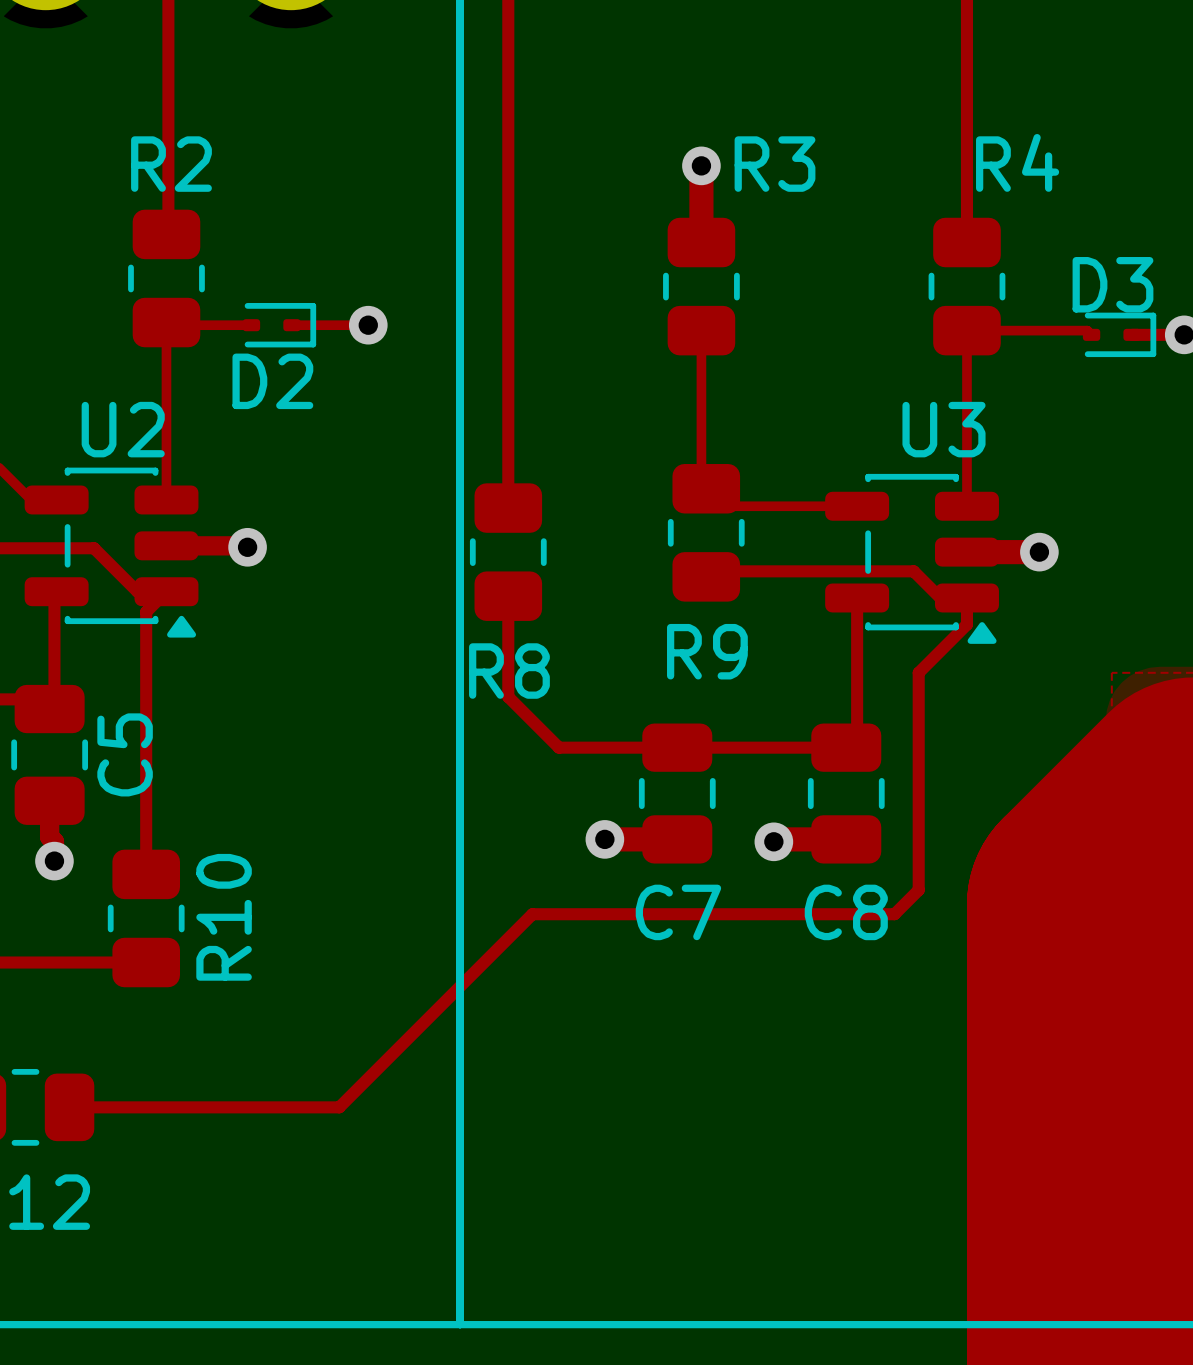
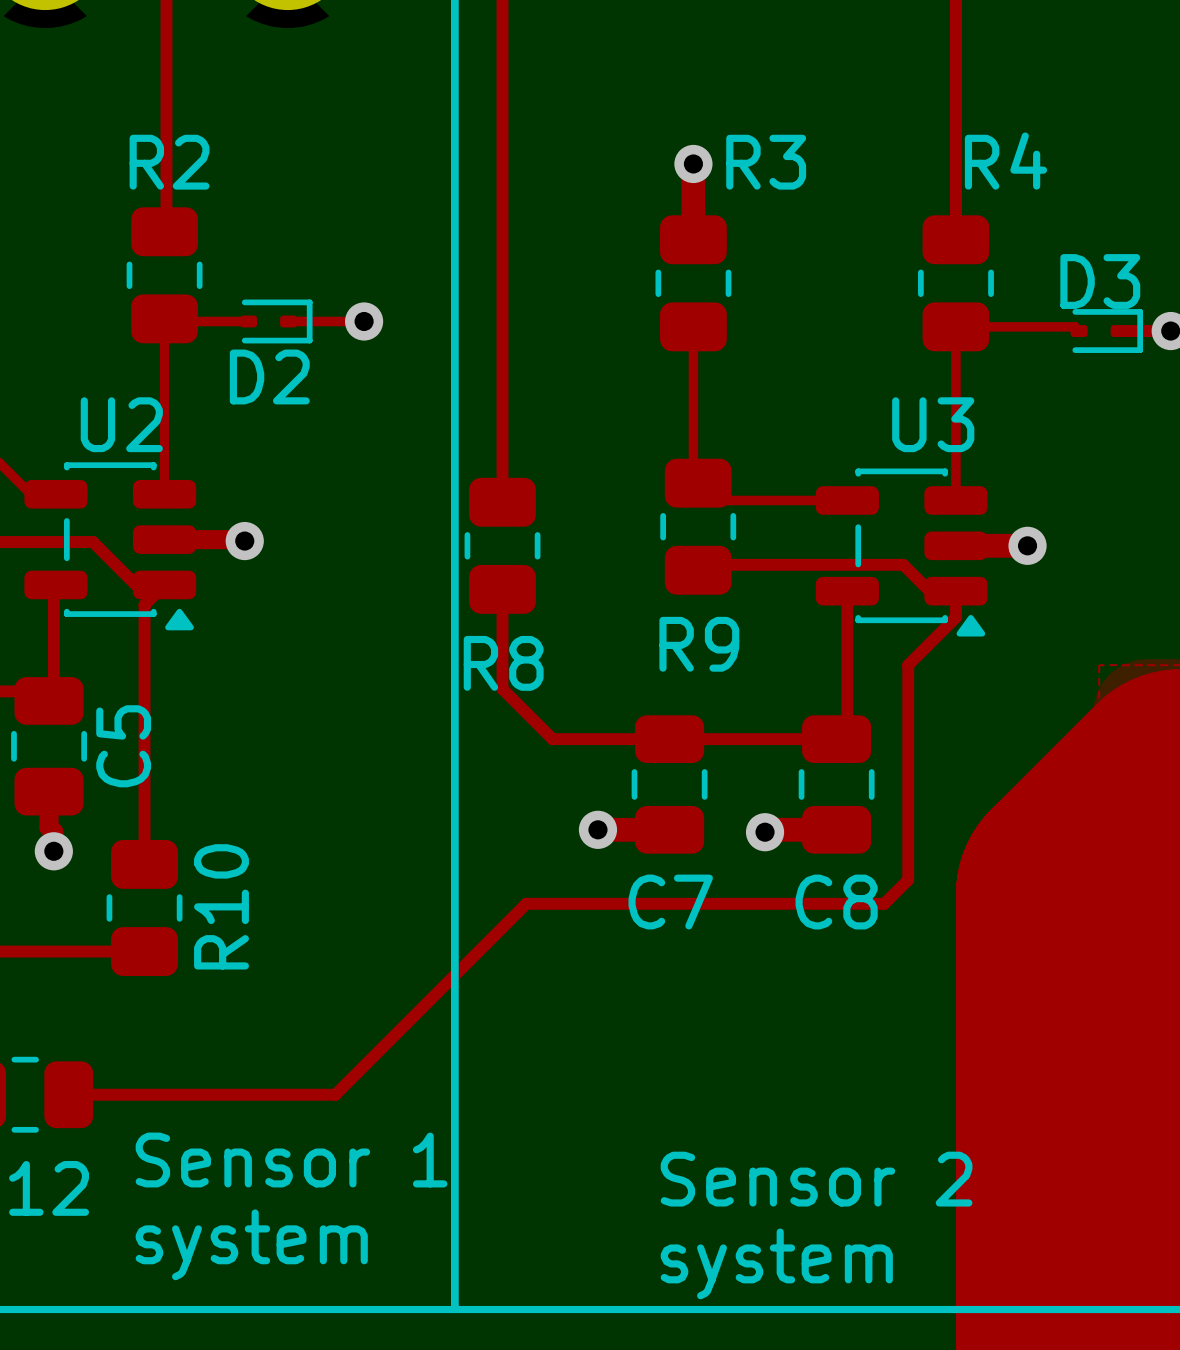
text: none -> Sensor 1 (291, 1160)
text: none -> Sensor 2 (816, 1179)
text: none -> system (251, 1244)
text: none -> system (776, 1263)

